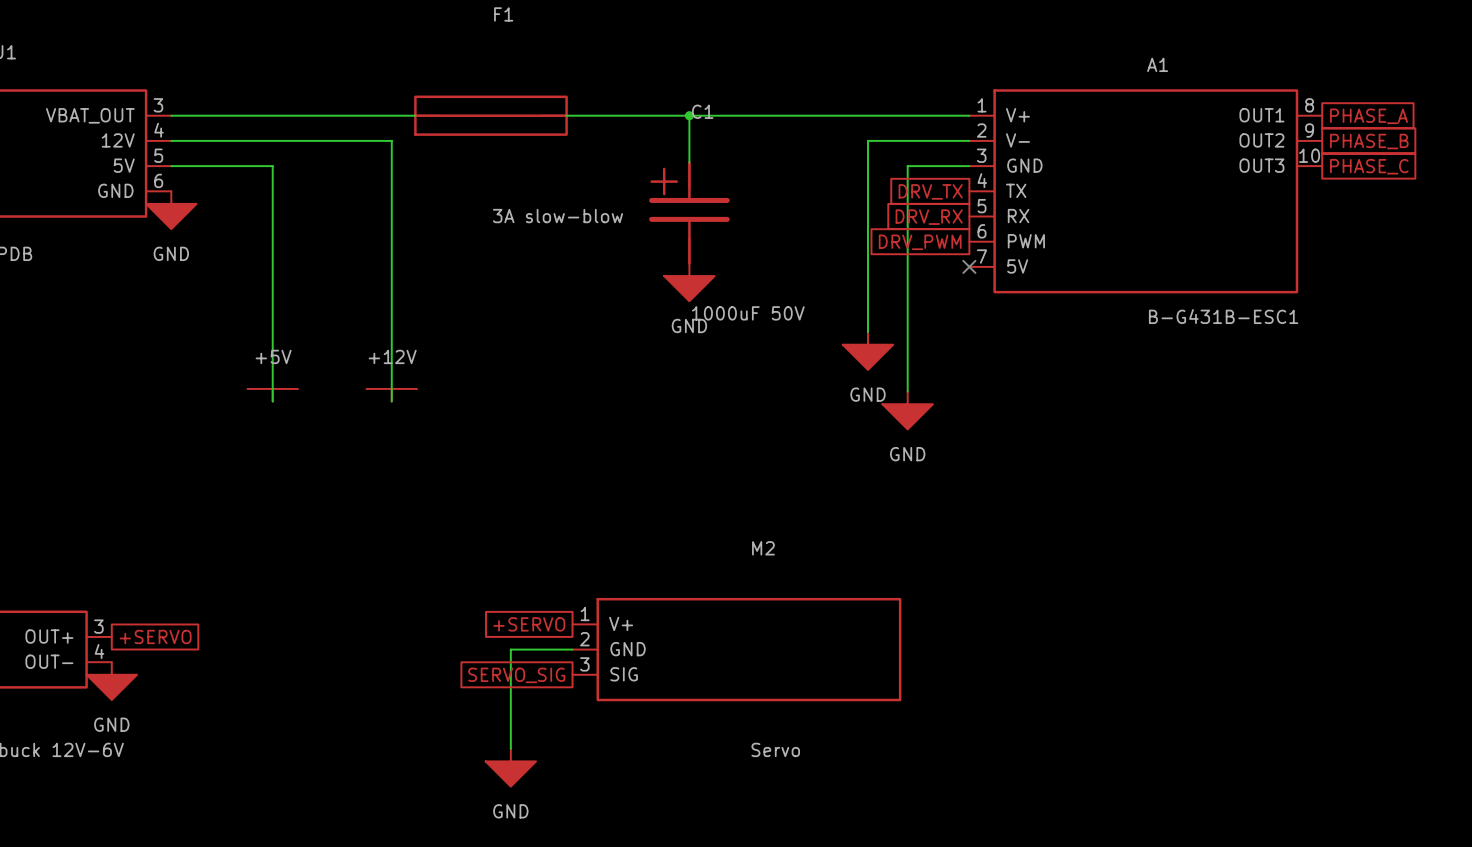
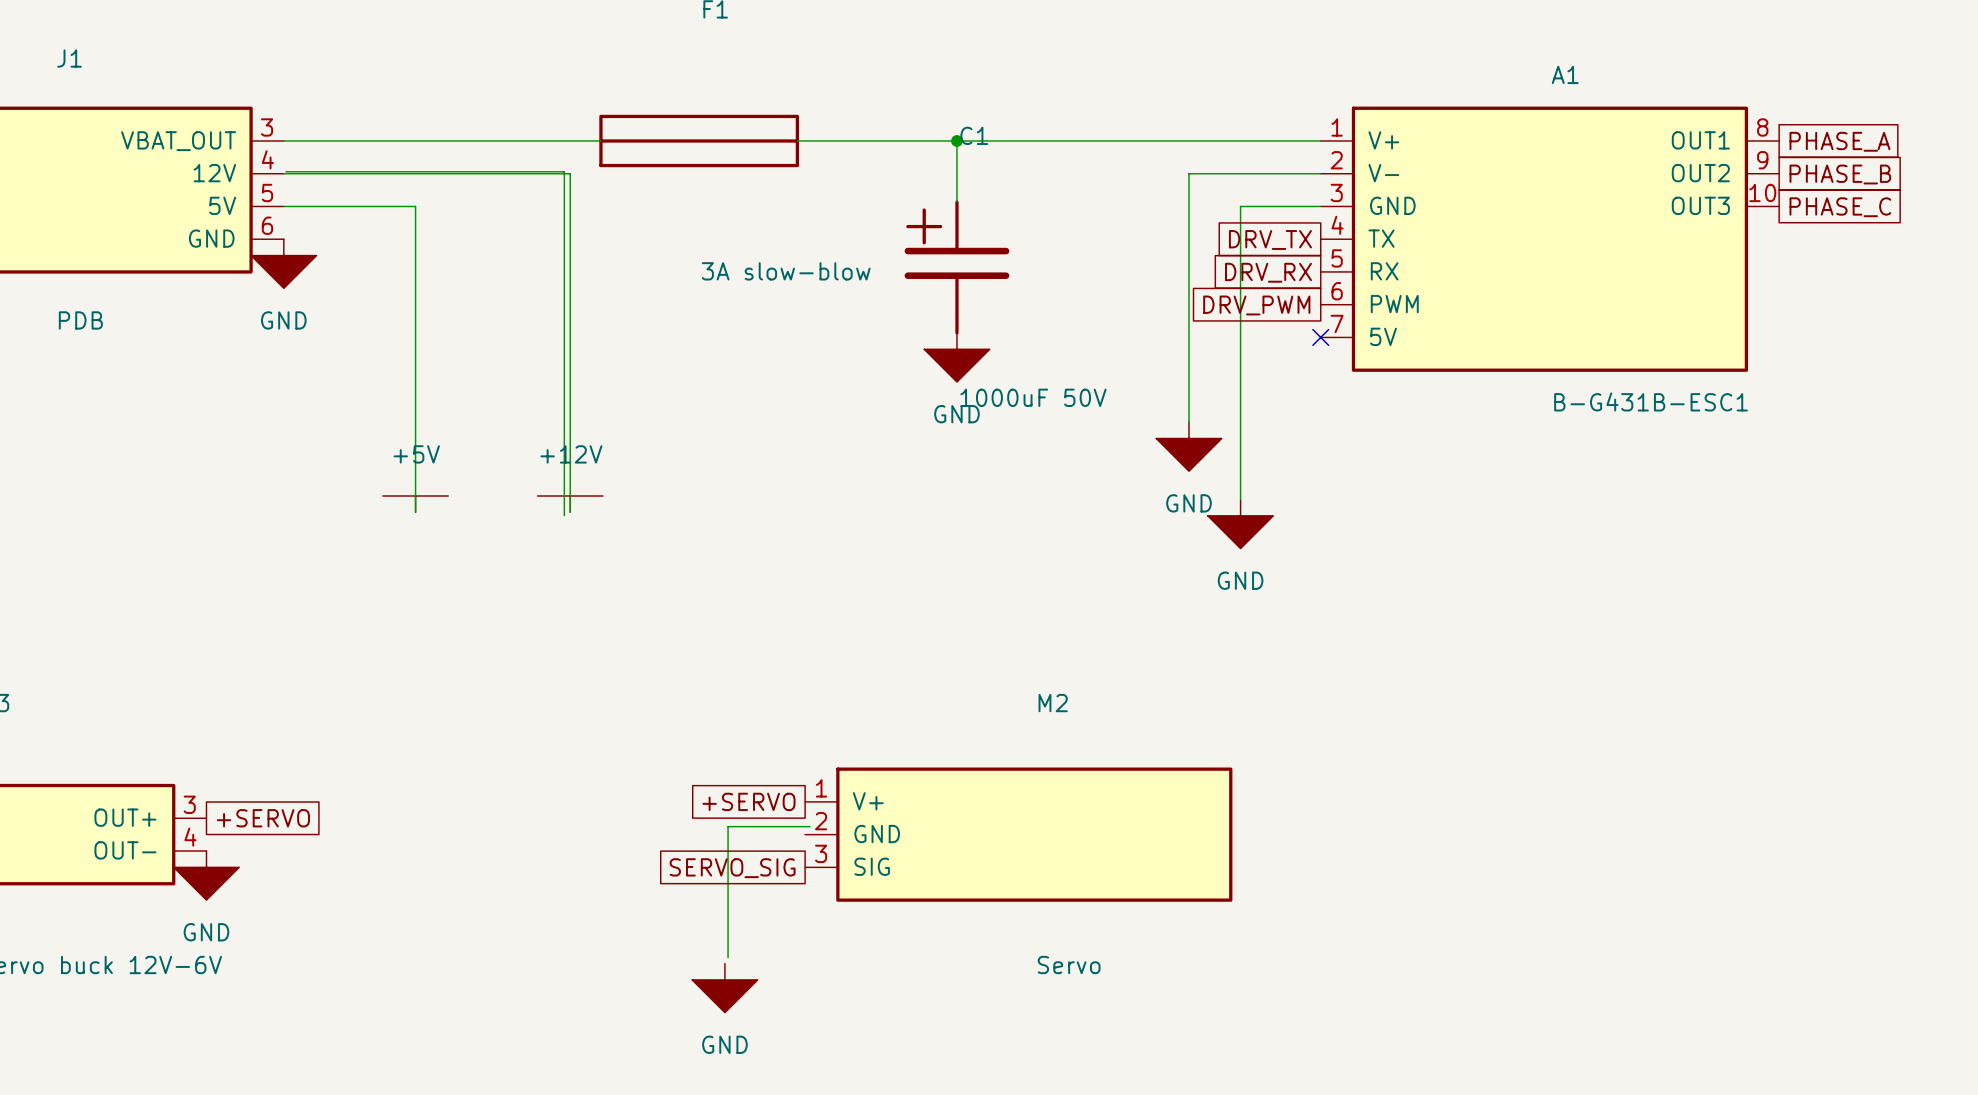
wire: none -> (286, 171) (564, 171) (564, 515)
wire: none -> (809, 826) (728, 826) (728, 957)
wire: (572, 649) (510, 649) (510, 748) -> none

